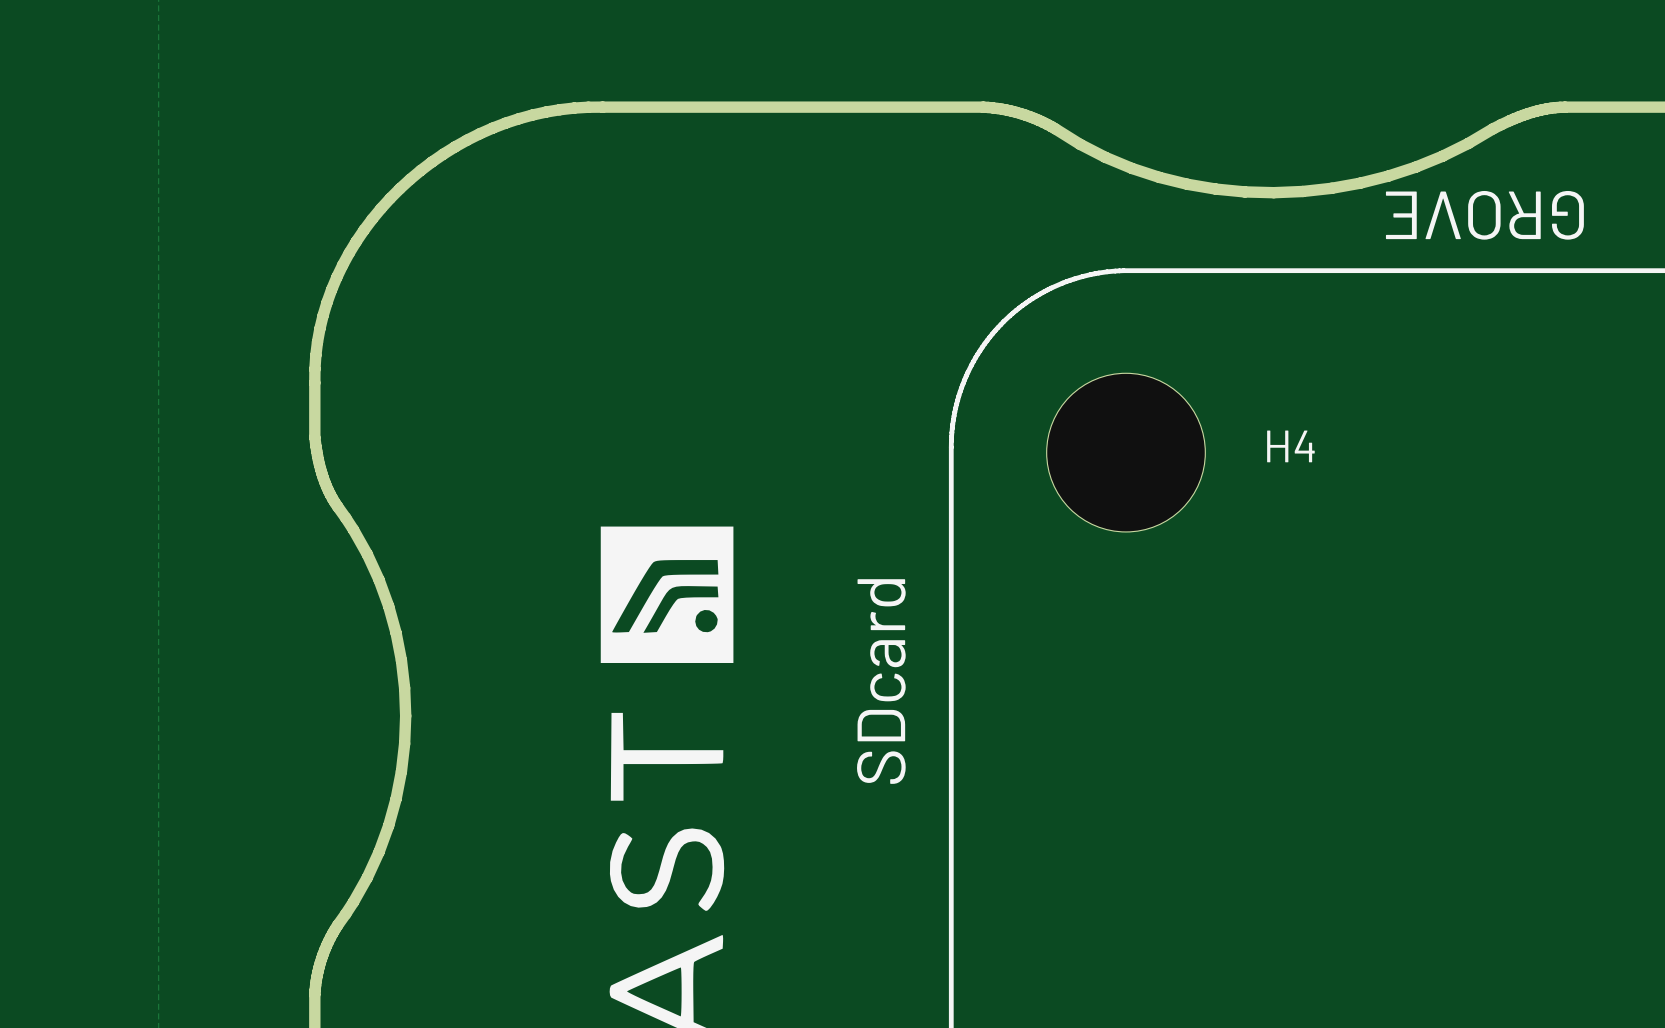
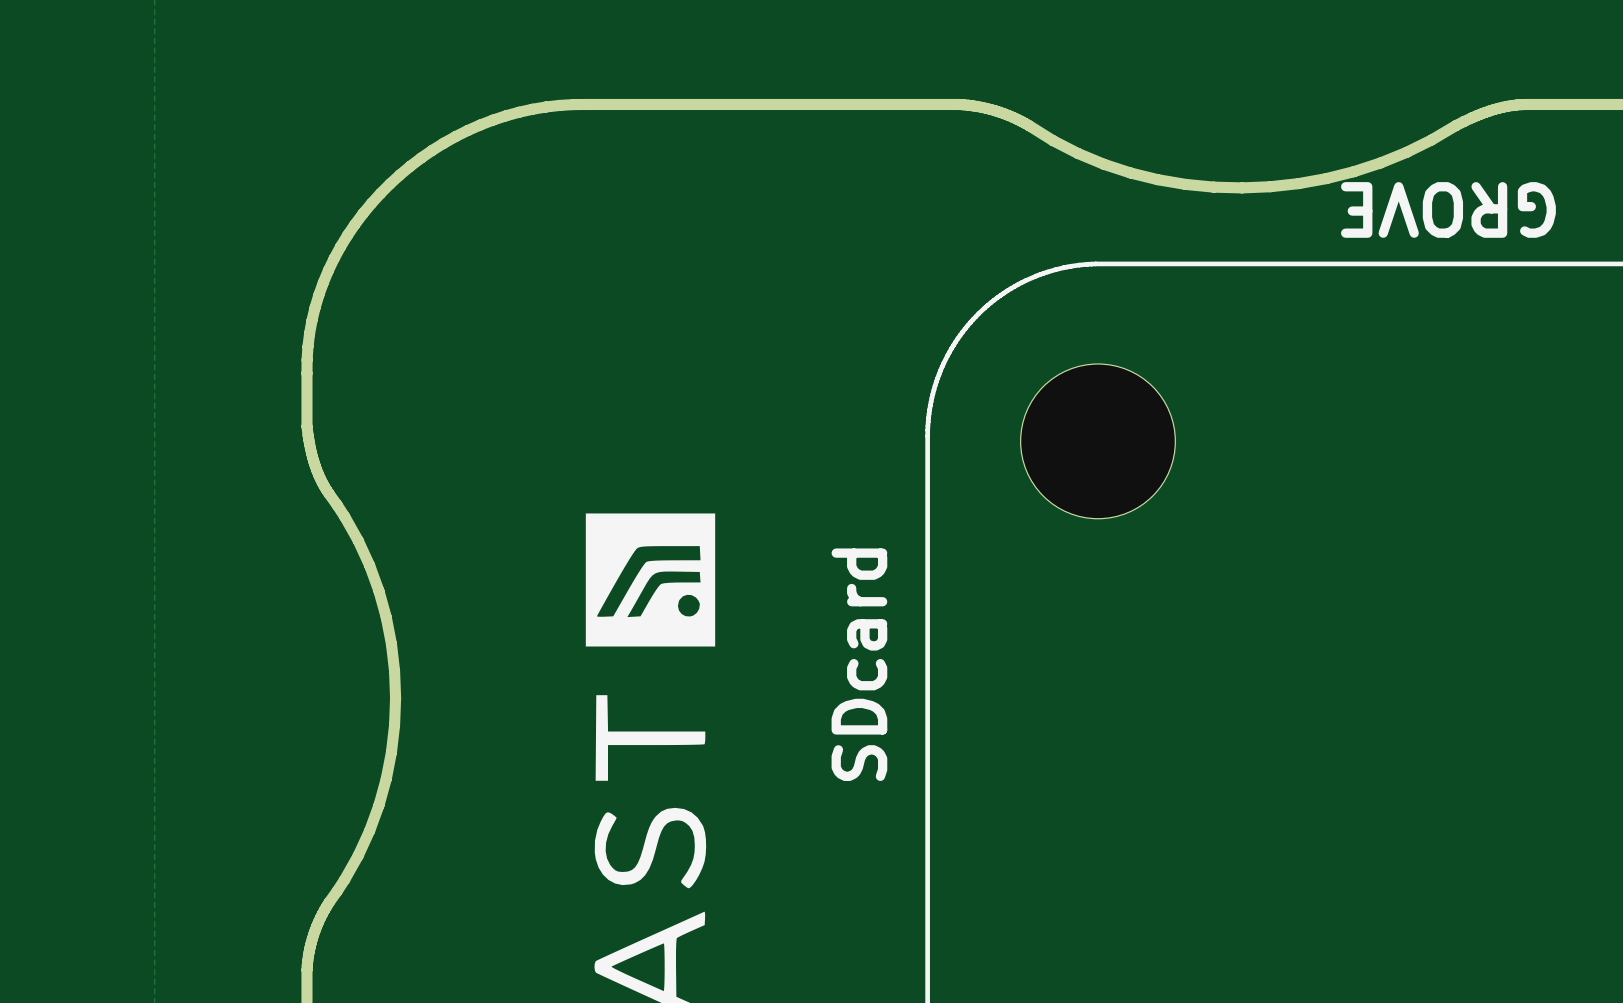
H4 name: H4 (1290, 446) -> none

